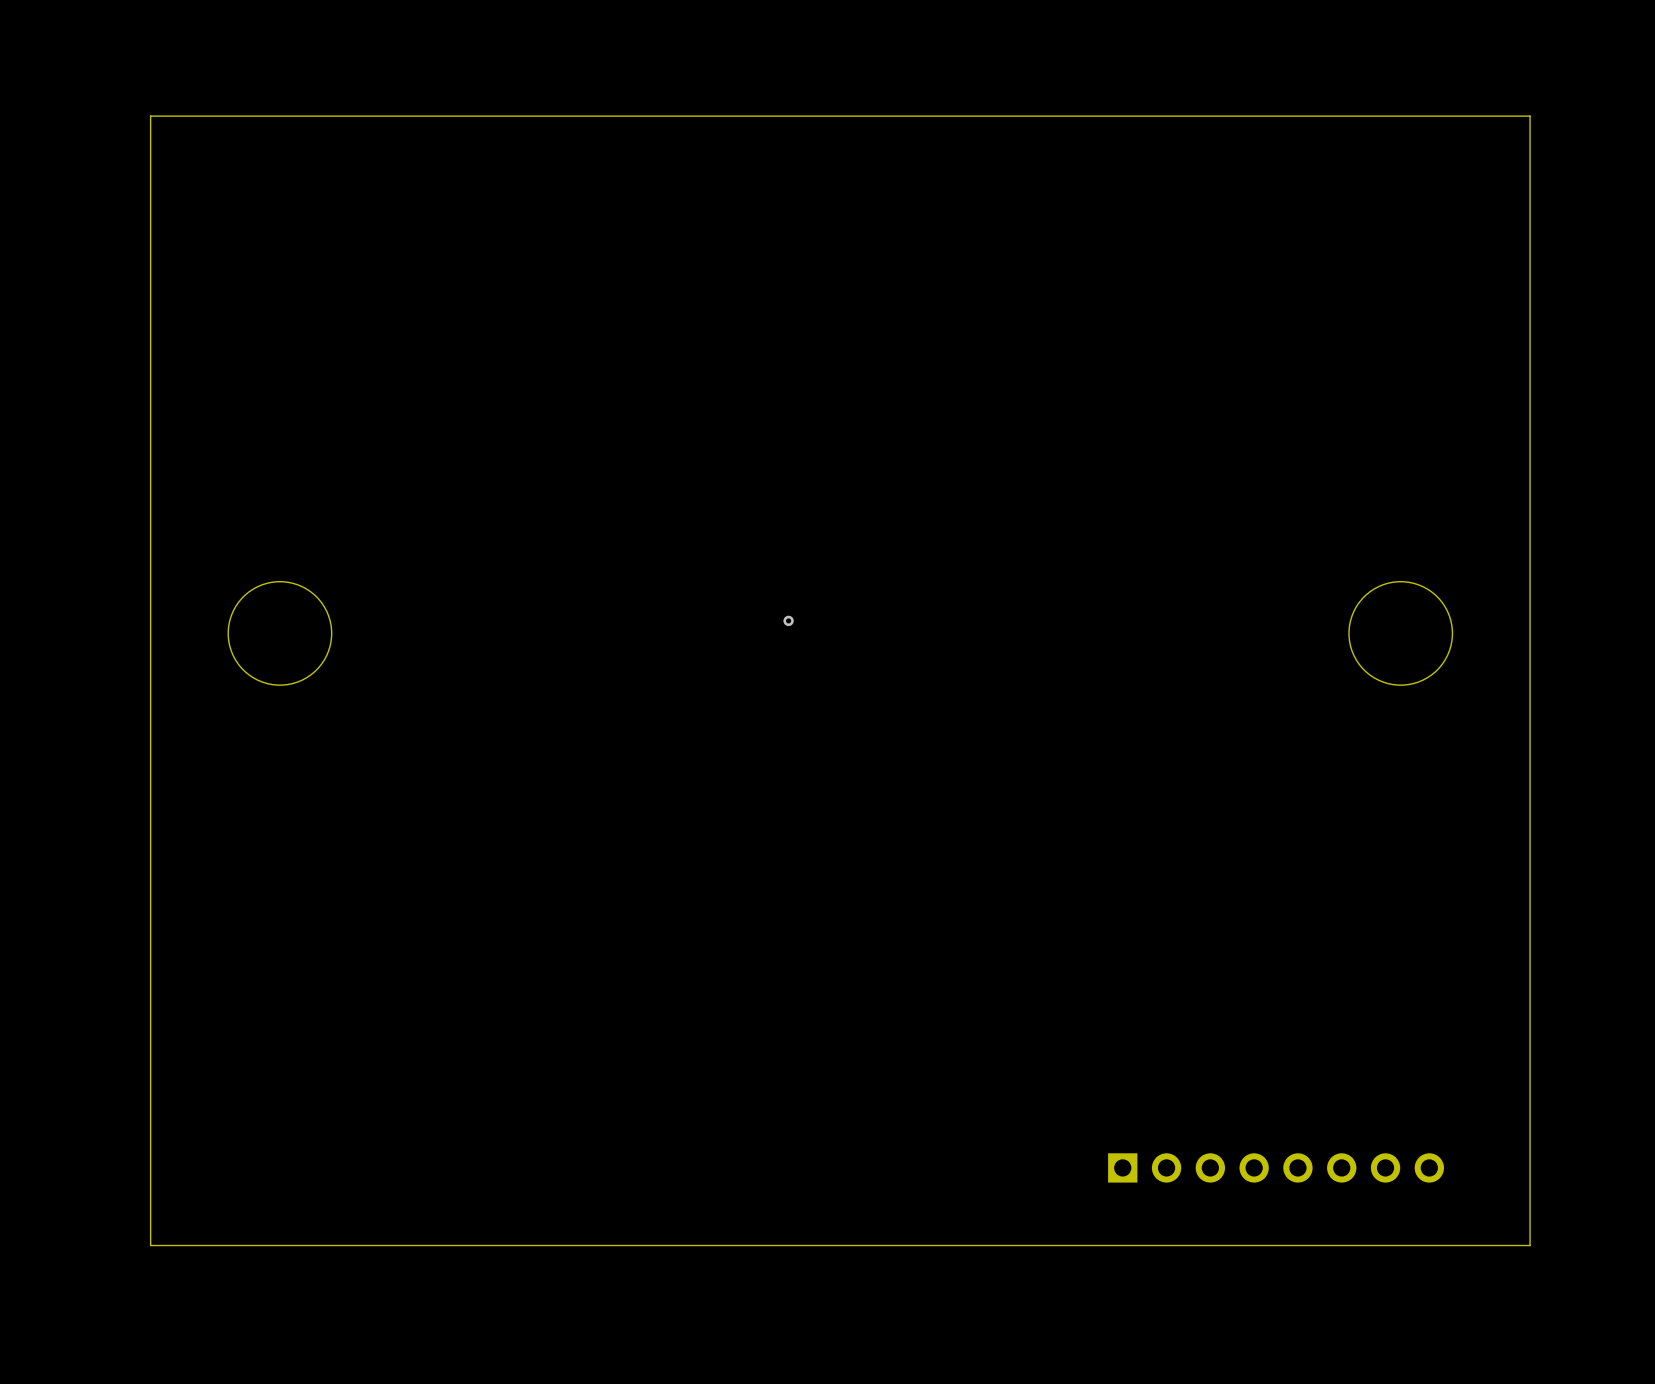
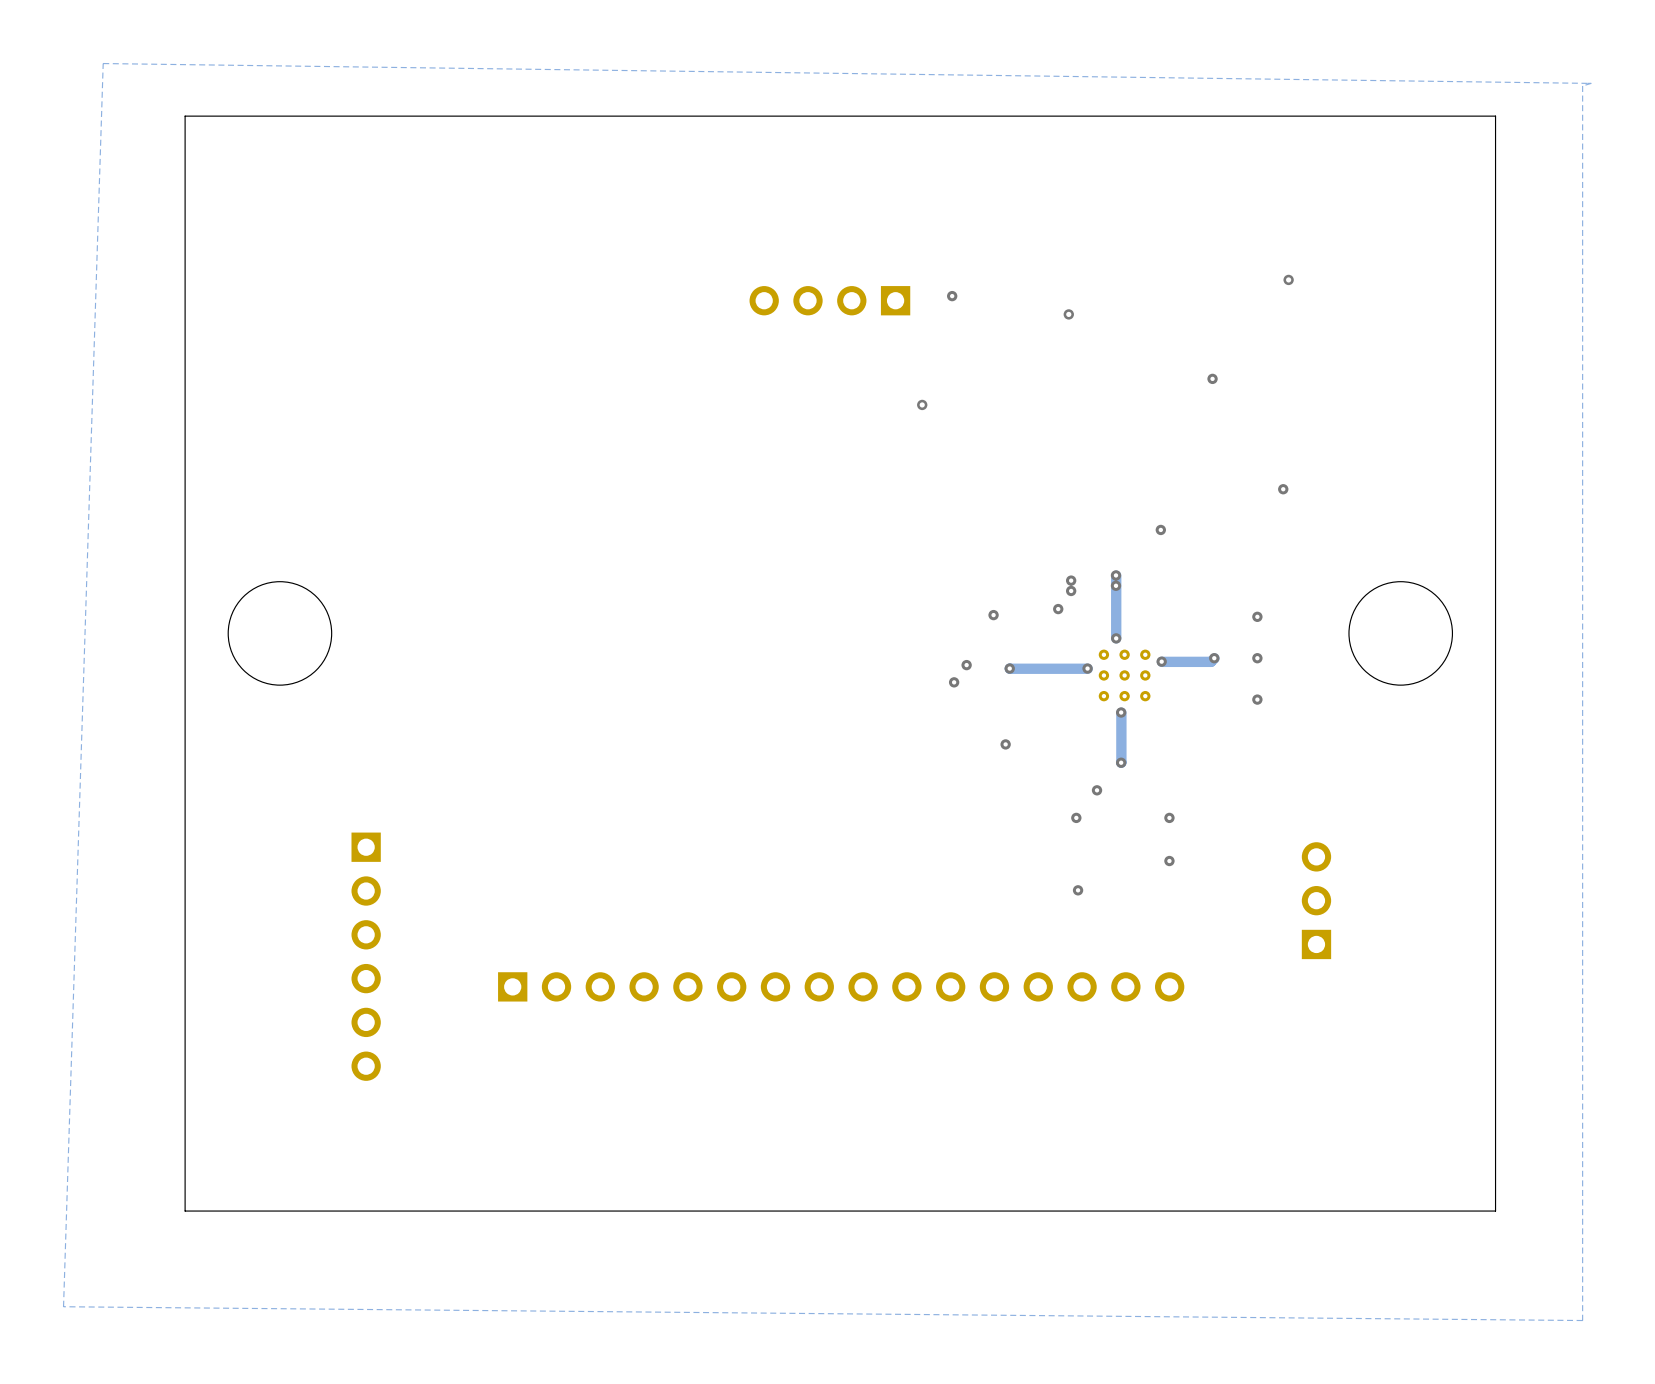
zone outline: none -> (103, 63) (63, 1306) (1582, 1320) (1582, 85) (1591, 83) (103, 63)
board edge: (1495, 116) (1530, 116) (1530, 1245) (150, 1245) (150, 116) (185, 116) -> (1495, 116) (1495, 1211) (185, 1211) (185, 116)
via: none -> (1288, 279)
via: none -> (952, 296)
part: none -> (829, 300)
via: none -> (1068, 314)
via: none -> (1212, 378)
via: none -> (922, 404)
via: none -> (1283, 489)
via: none -> (1160, 529)
via: none -> (1115, 575)
track: none -> (1116, 575) (1116, 638)
via: none -> (1071, 580)
via: none -> (1115, 585)
via: none -> (1071, 590)
via: none -> (1058, 609)
via: none -> (993, 615)
via: none -> (1257, 616)
via: (788, 620) -> none
via: none -> (1116, 638)
track: none -> (1214, 658) (1211, 661) (1161, 661)
via: none -> (1214, 658)
via: none -> (1257, 658)
via: none -> (1161, 661)
via: none -> (966, 665)
via: none -> (1009, 668)
track: none -> (1087, 668) (1009, 668)
via: none -> (1087, 668)
part: none -> (1124, 675)
via: none -> (954, 682)
via: none -> (1257, 699)
track: none -> (1121, 712) (1121, 762)
via: none -> (1121, 712)
via: none -> (1005, 744)
via: none -> (1121, 762)
via: none -> (1097, 790)
via: none -> (1076, 817)
via: none -> (1169, 817)
via: none -> (1169, 861)
via: none -> (1078, 890)
part: none -> (1316, 900)
part: none -> (366, 956)
part: none -> (841, 986)
part: (1276, 1167) -> none

